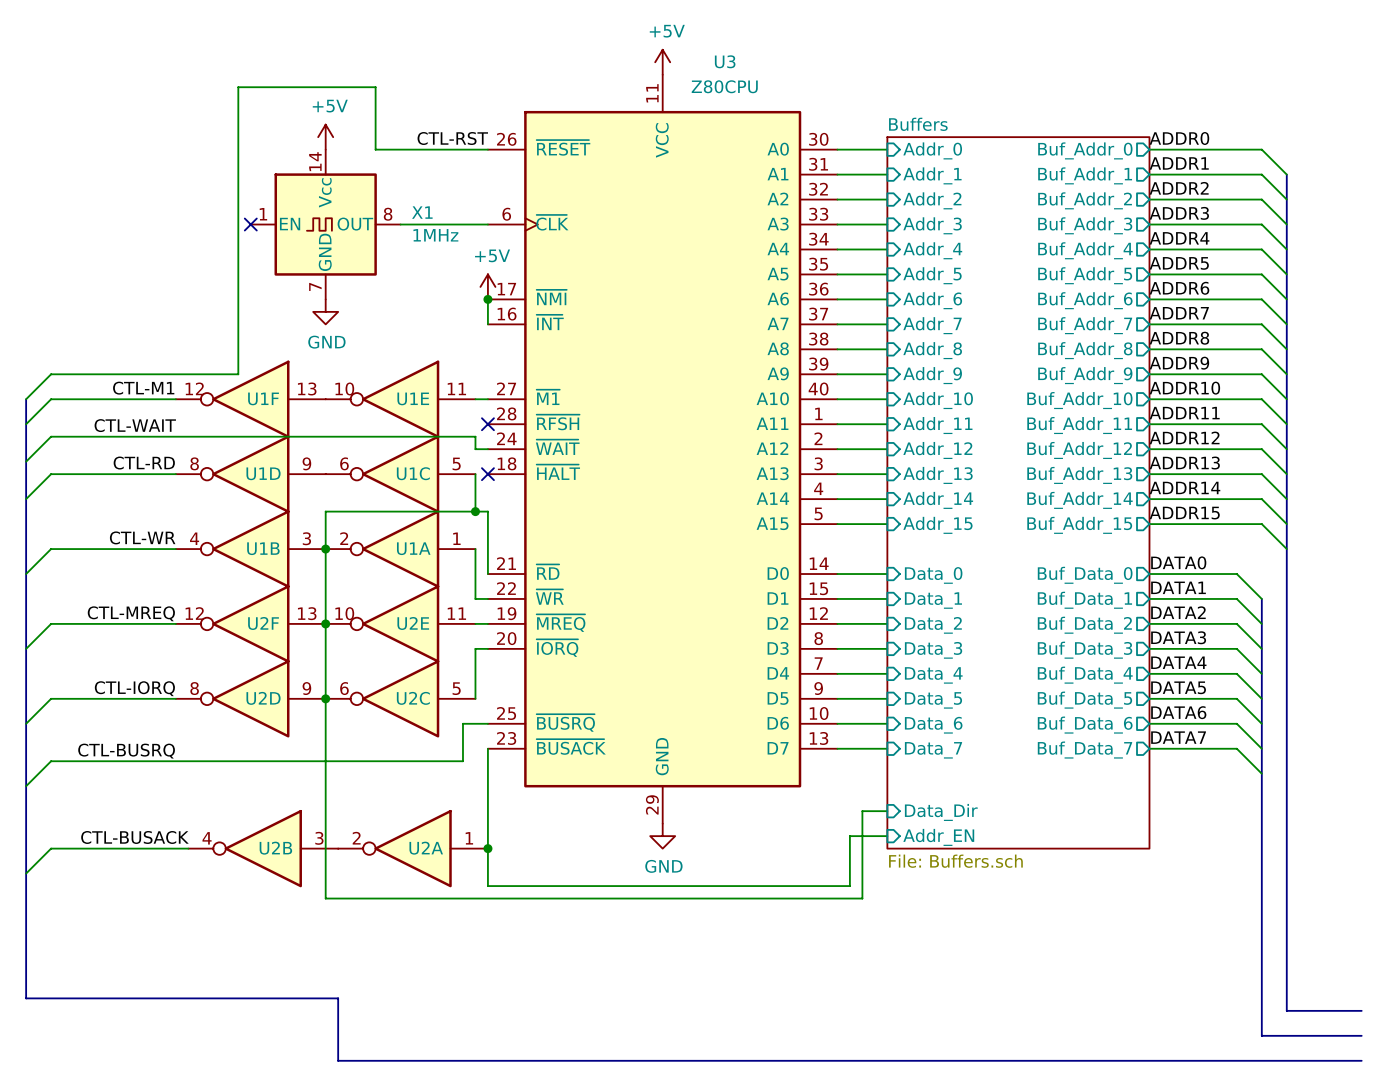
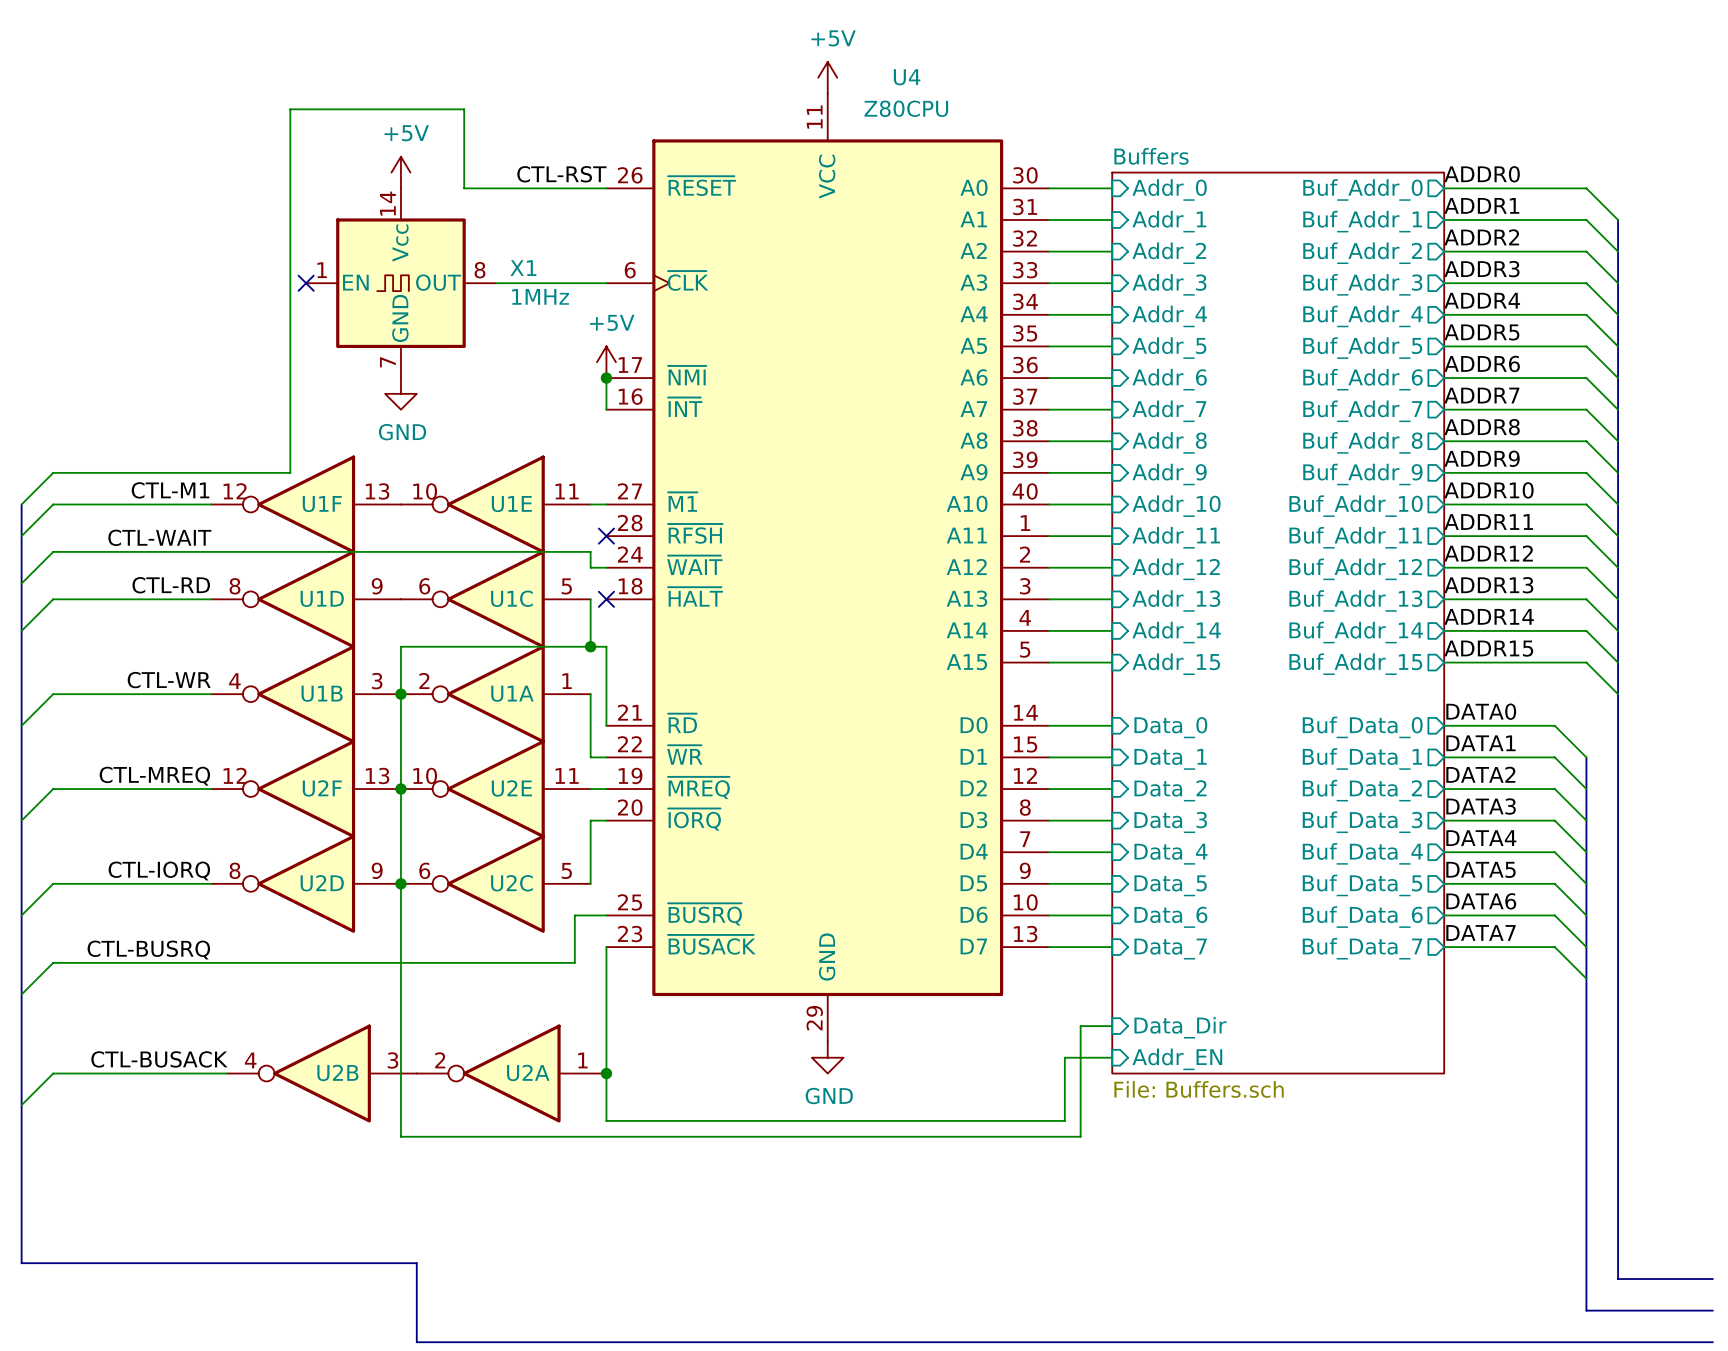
U3 name: U3 (725, 61) -> U4 (907, 77)

